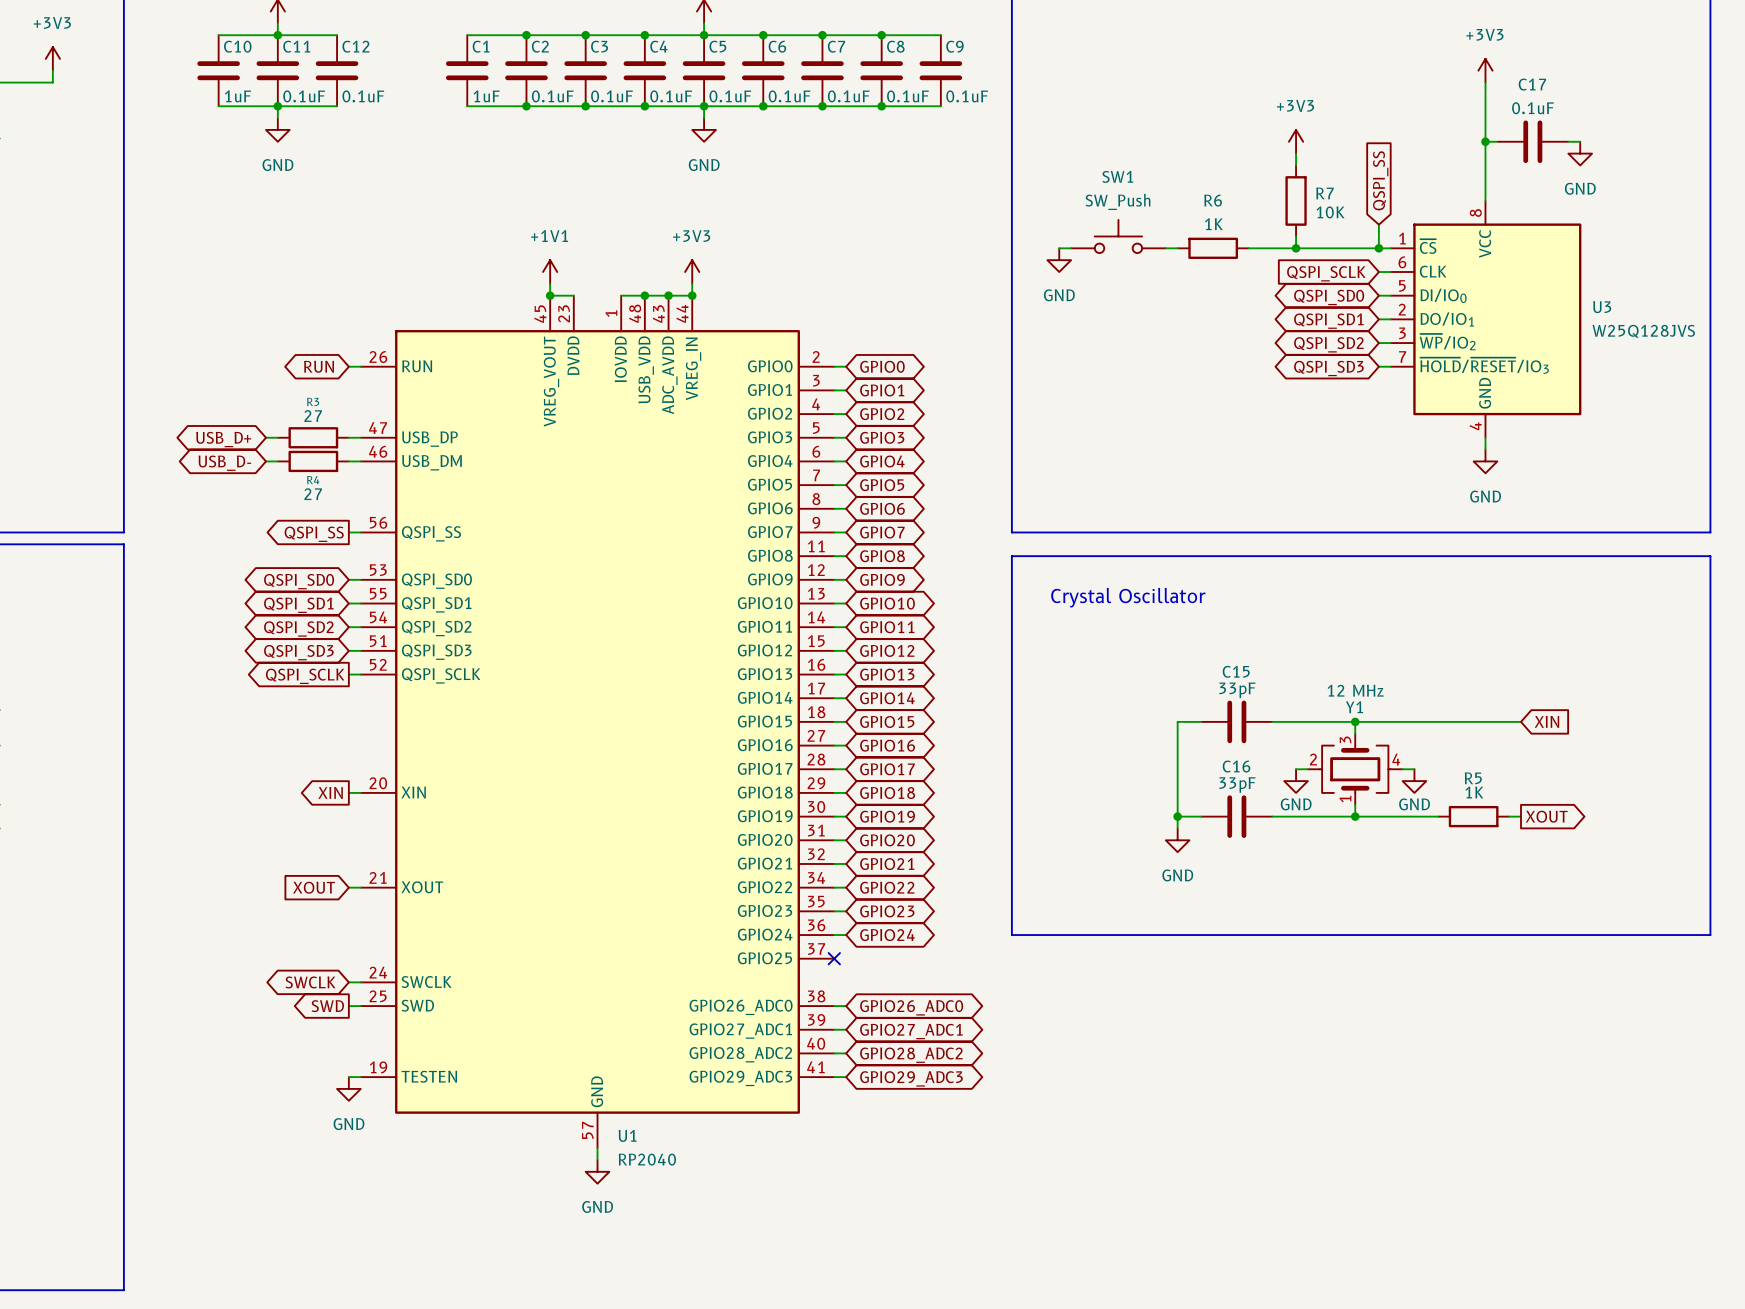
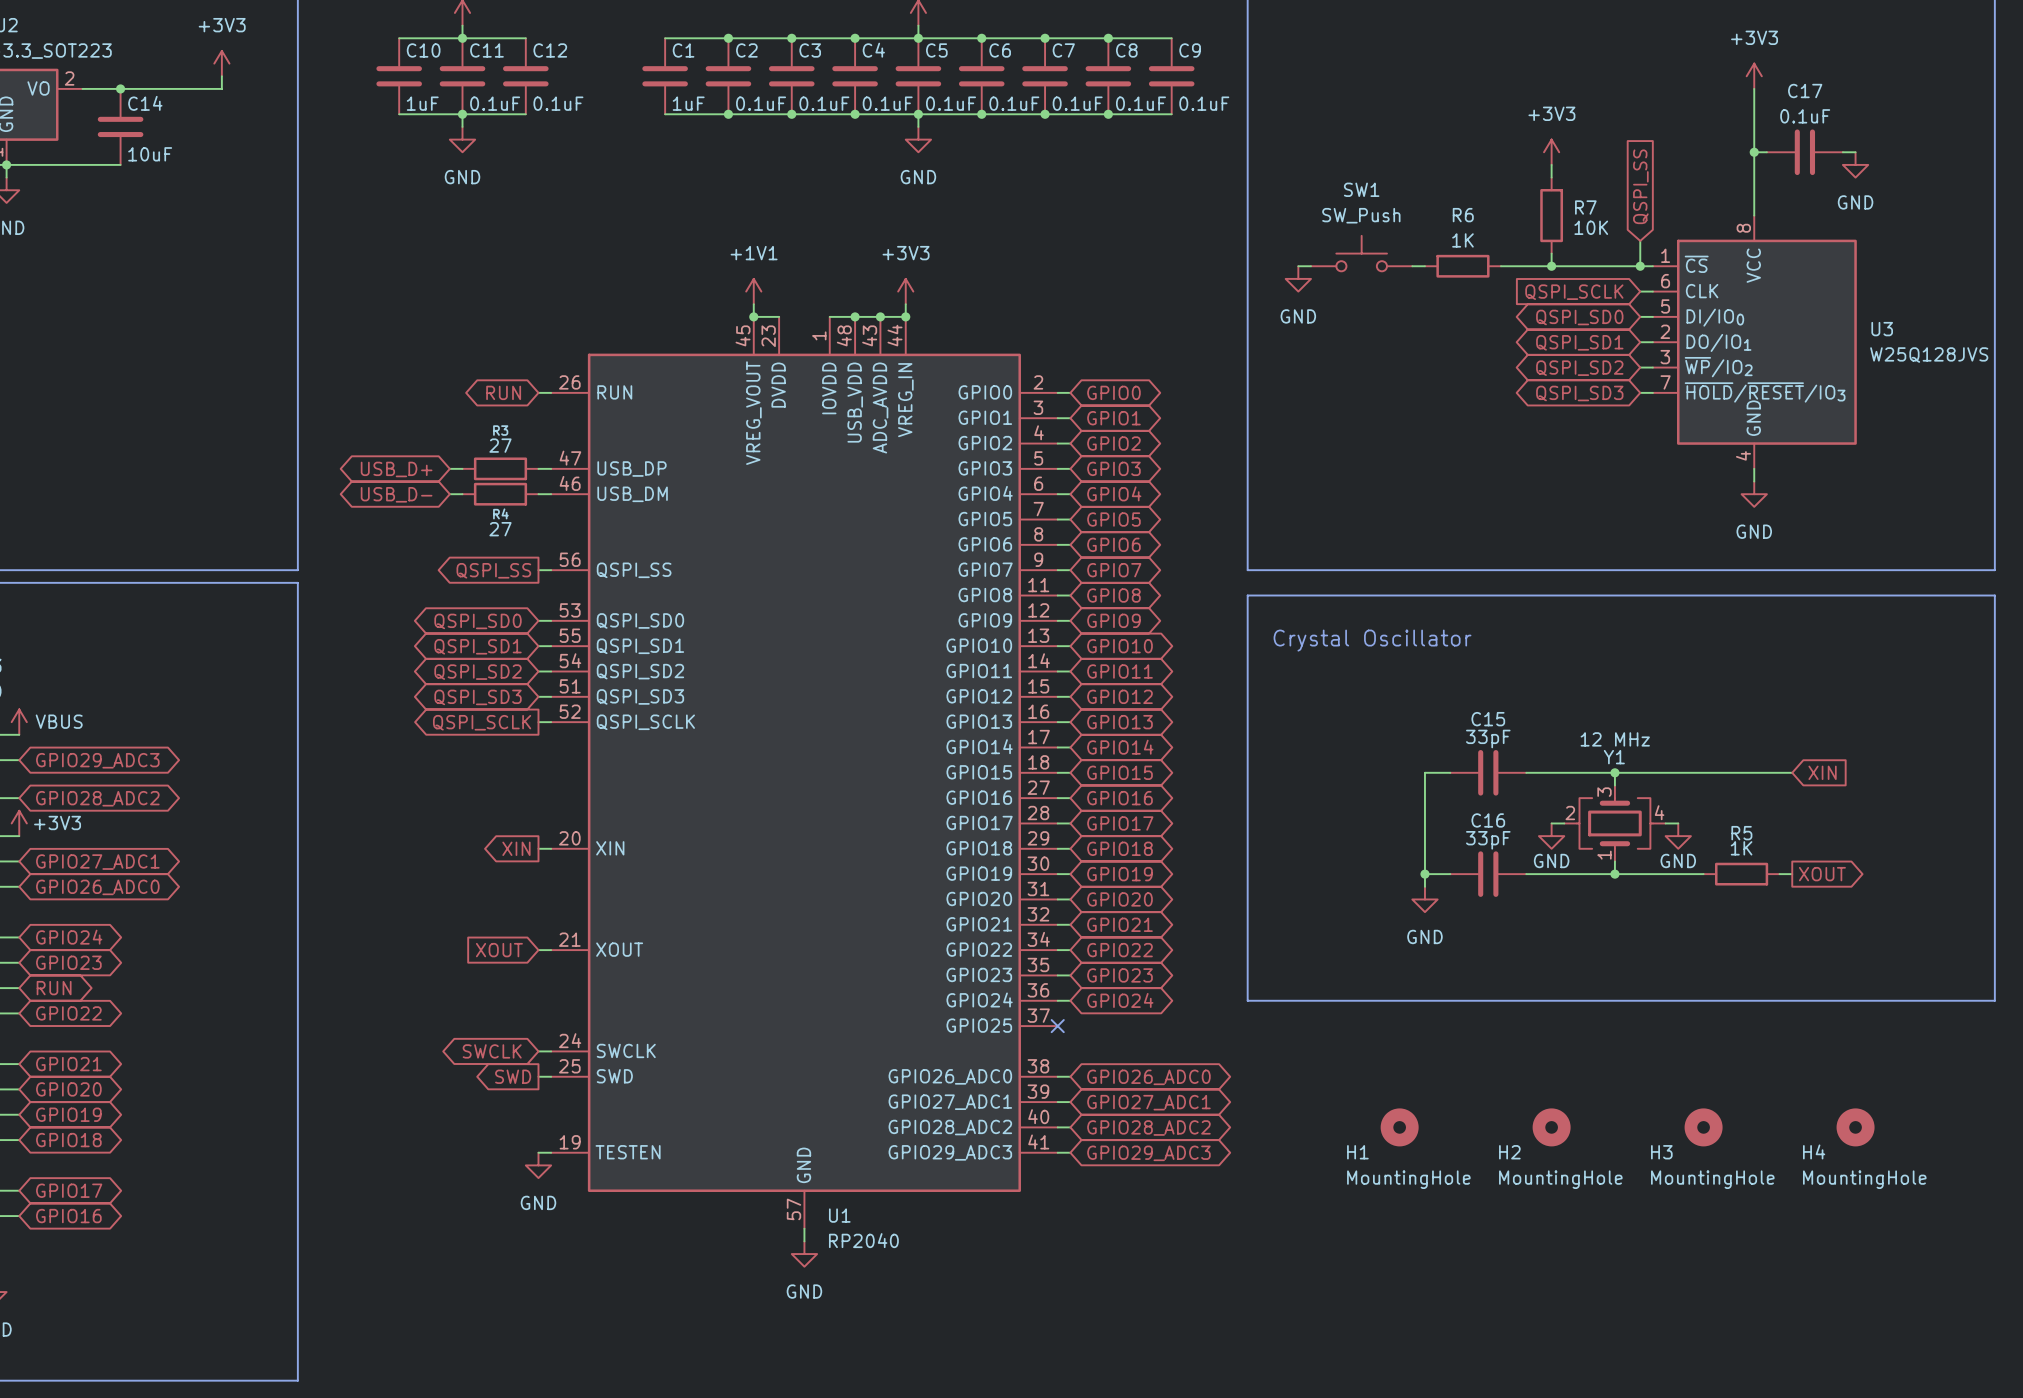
H1: none -> MountingHole (1399, 1127)
H2: none -> MountingHole (1551, 1127)
H3: none -> MountingHole (1703, 1127)
H4: none -> MountingHole (1855, 1127)

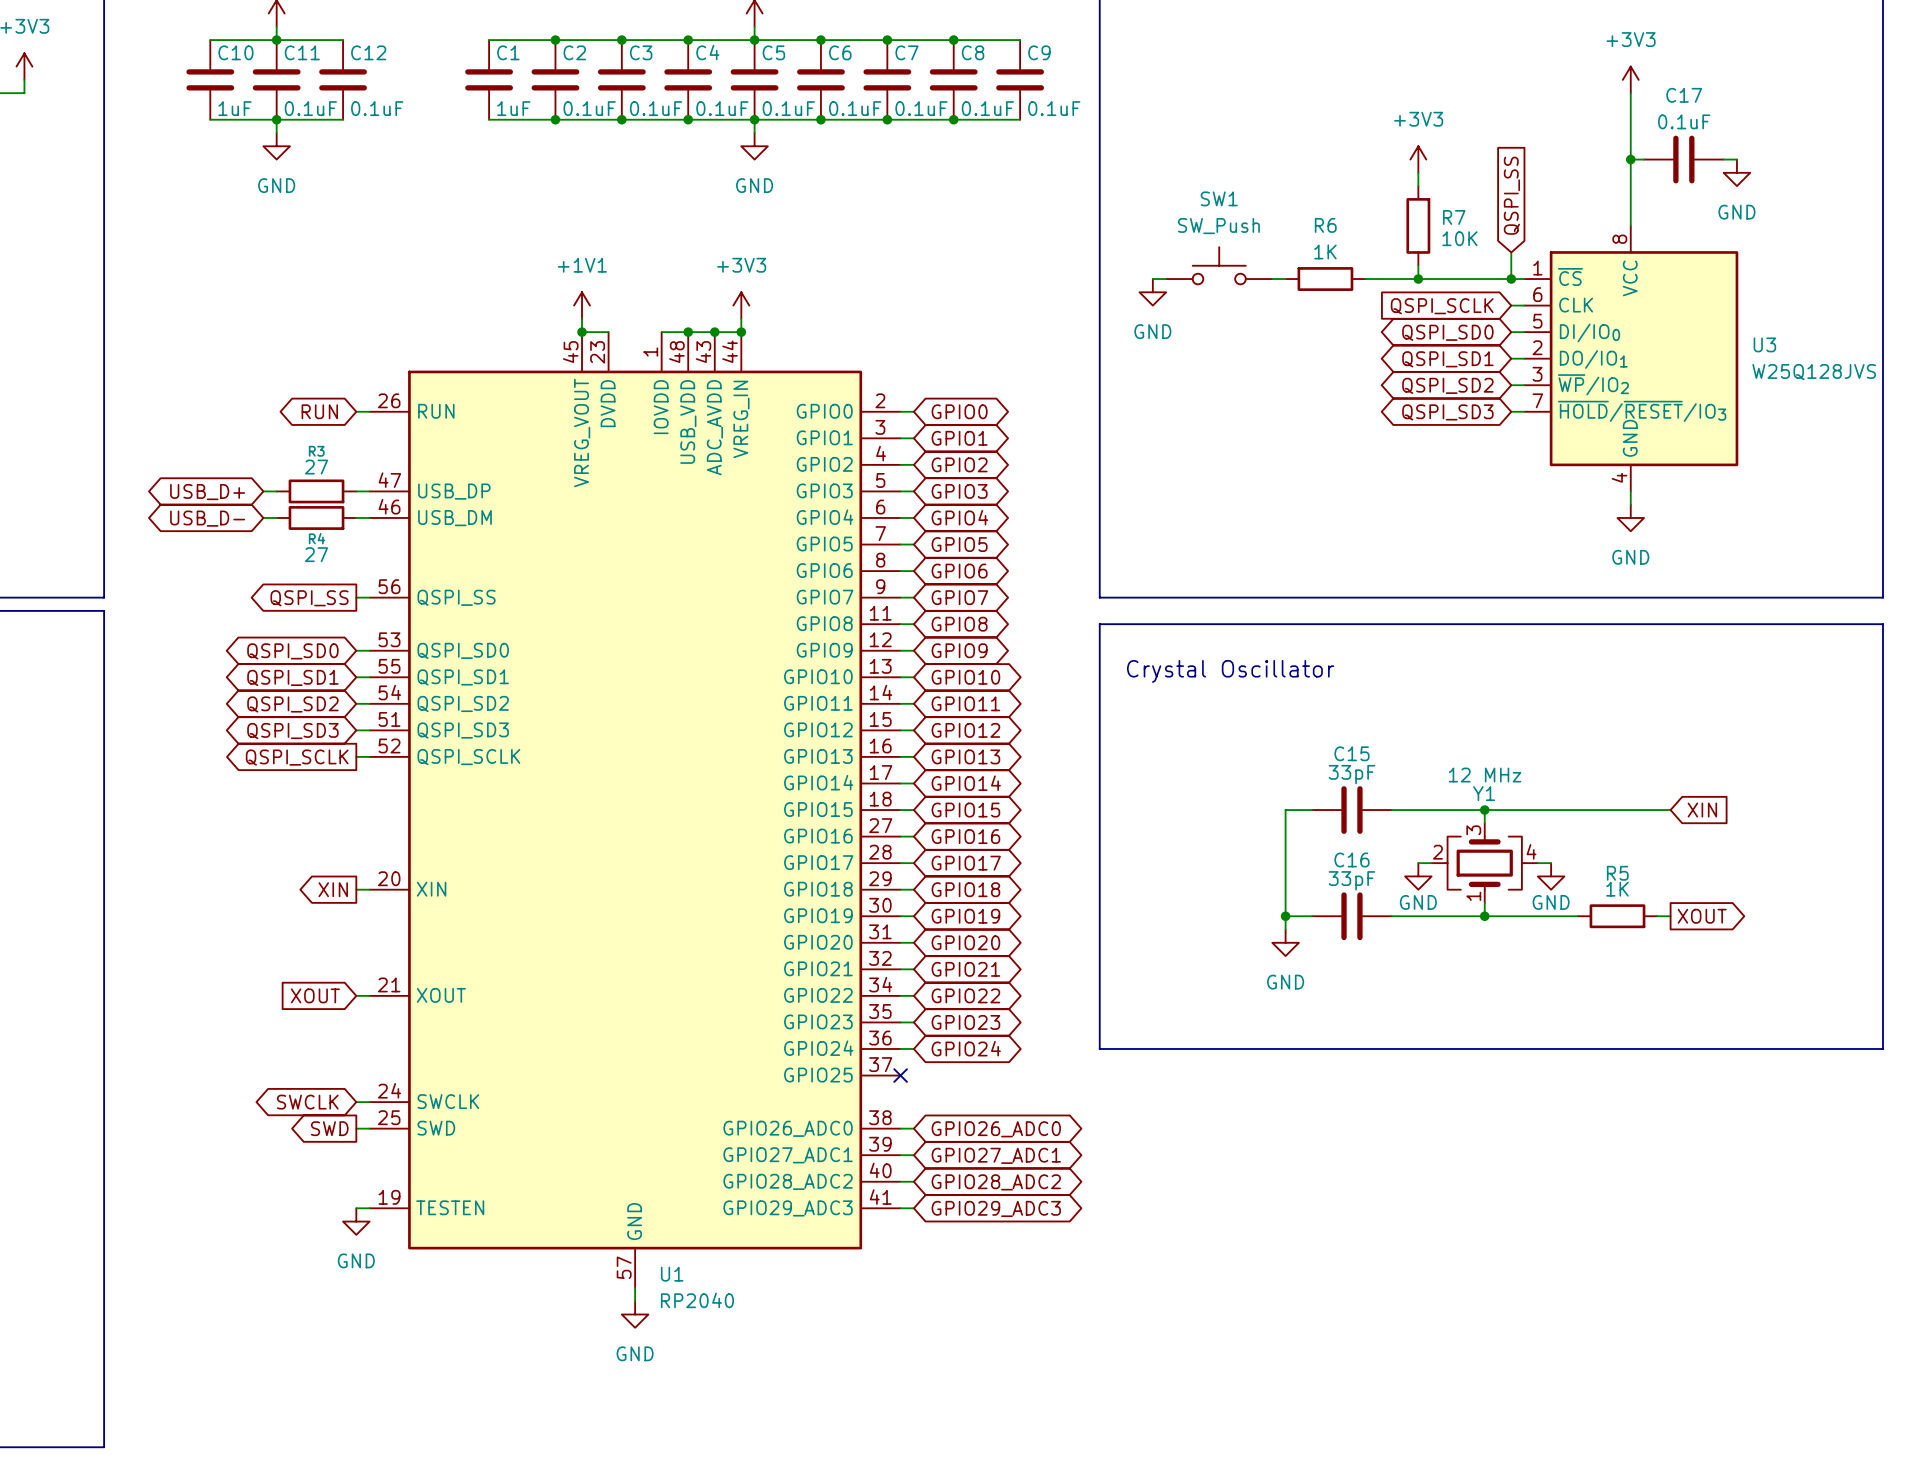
H1: MountingHole (1399, 1127) -> none
H2: MountingHole (1551, 1127) -> none
H3: MountingHole (1703, 1127) -> none
H4: MountingHole (1855, 1127) -> none

